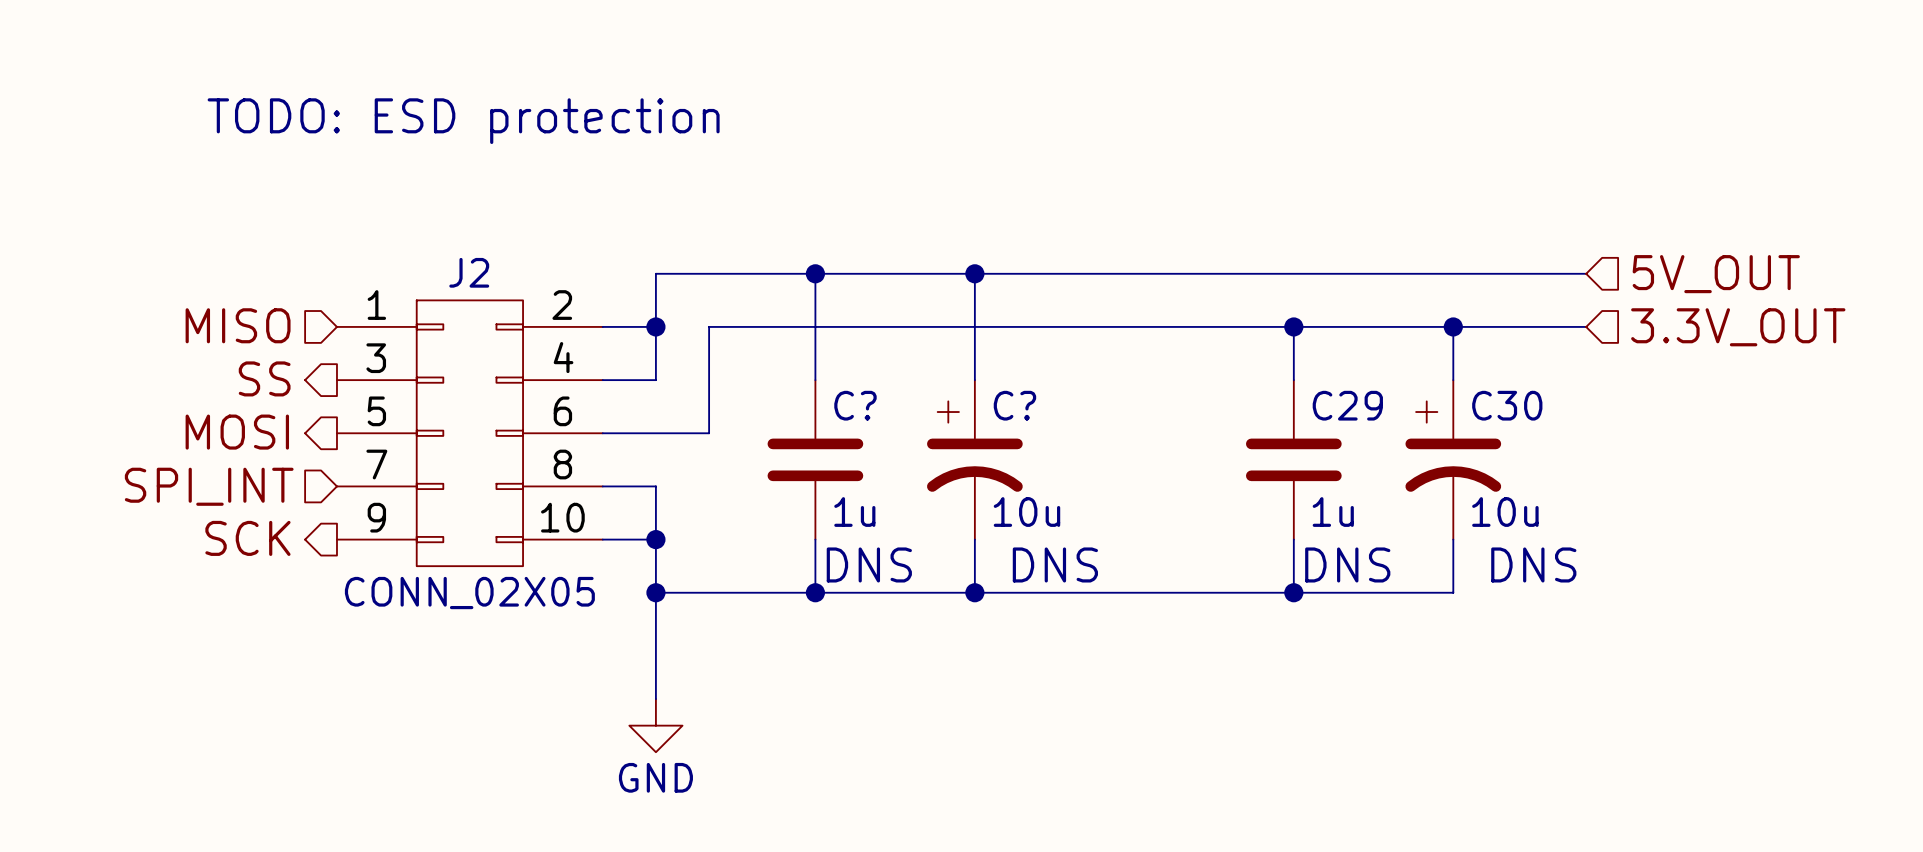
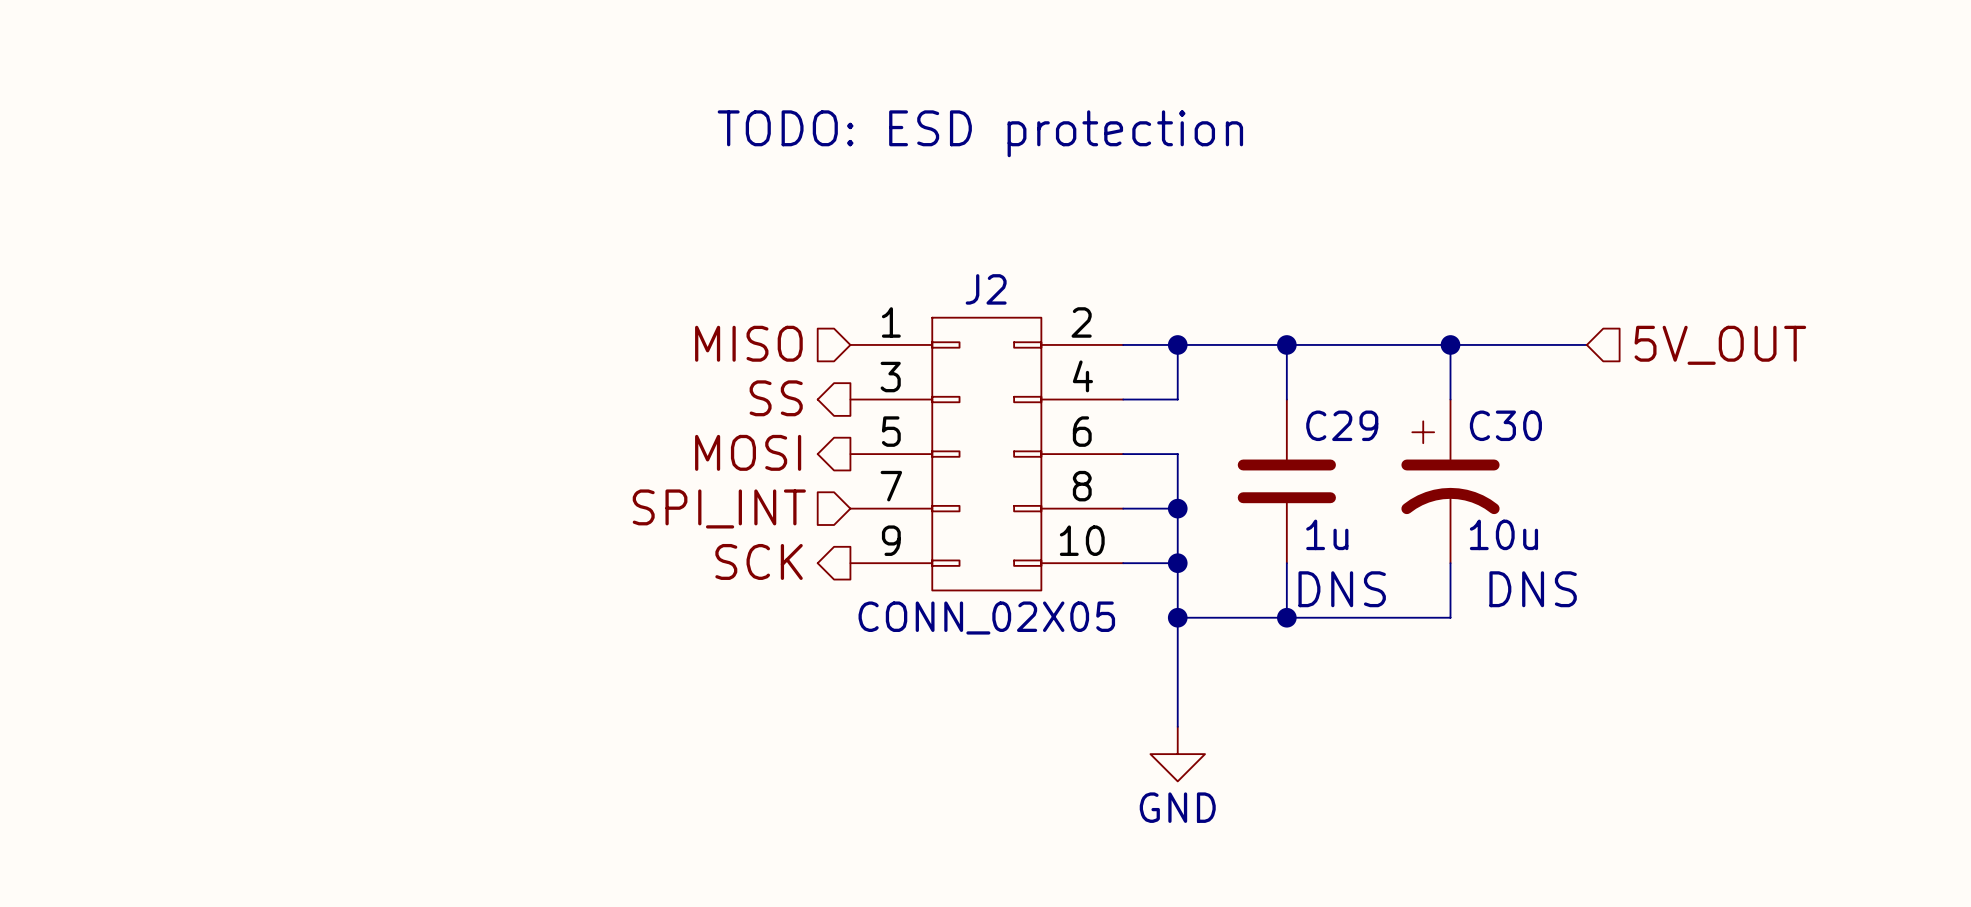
text: TODO: ESD protection (463, 121) -> none
text: none -> TODO: ESD protection (980, 133)
wire: (815, 273) (815, 380) -> none
junction: (815, 273) -> none
wire: (974, 273) (974, 380) -> none
junction: (974, 273) -> none
wire: (1586, 273) (655, 273) (655, 380) (602, 380) -> none
hierarchical label: 5V_OUT (1716, 274) -> none
hierarchical label: MISO (238, 325) -> none
hierarchical label: none -> MISO (748, 343)
wire: (602, 326) (655, 326) -> none
junction: (655, 326) -> none
wire: (1134, 326) (709, 326) (709, 433) (602, 433) -> none
wire: none -> (1177, 344) (1177, 399) (1123, 399)
junction: none -> (1177, 344)
hierarchical label: 3.3V_OUT (1738, 327) -> 5V_OUT (1720, 345)
hierarchical label: SS (264, 378) -> none
hierarchical label: none -> SS (776, 398)
hierarchical label: MOSI (237, 432) -> none
hierarchical label: none -> MOSI (748, 452)
J2 position: (469, 433) -> (986, 454)
wire: none -> (1123, 454) (1177, 454) (1177, 726)
C?: 1u (815, 459) -> none
C?: 10u (974, 459) -> none
hierarchical label: SPI_INT (209, 486) -> none
wire: (602, 486) (655, 486) (655, 699) -> none
hierarchical label: none -> SPI_INT (719, 508)
wire: none -> (1123, 508) (1177, 508)
junction: none -> (1177, 508)
hierarchical label: SCK (247, 538) -> none
hierarchical label: none -> SCK (759, 561)
wire: (602, 539) (655, 539) -> none
junction: (655, 539) -> none
wire: (815, 539) (815, 592) -> none
wire: (974, 539) (974, 592) -> none
wire: none -> (1123, 563) (1177, 563)
junction: none -> (1177, 563)
wire: (655, 592) (1187, 592) -> none
junction: (655, 592) -> none
junction: (815, 592) -> none
junction: (974, 592) -> none
junction: none -> (1177, 617)
power symbol: GND (655, 725) -> none
power symbol: none -> GND (1177, 754)

